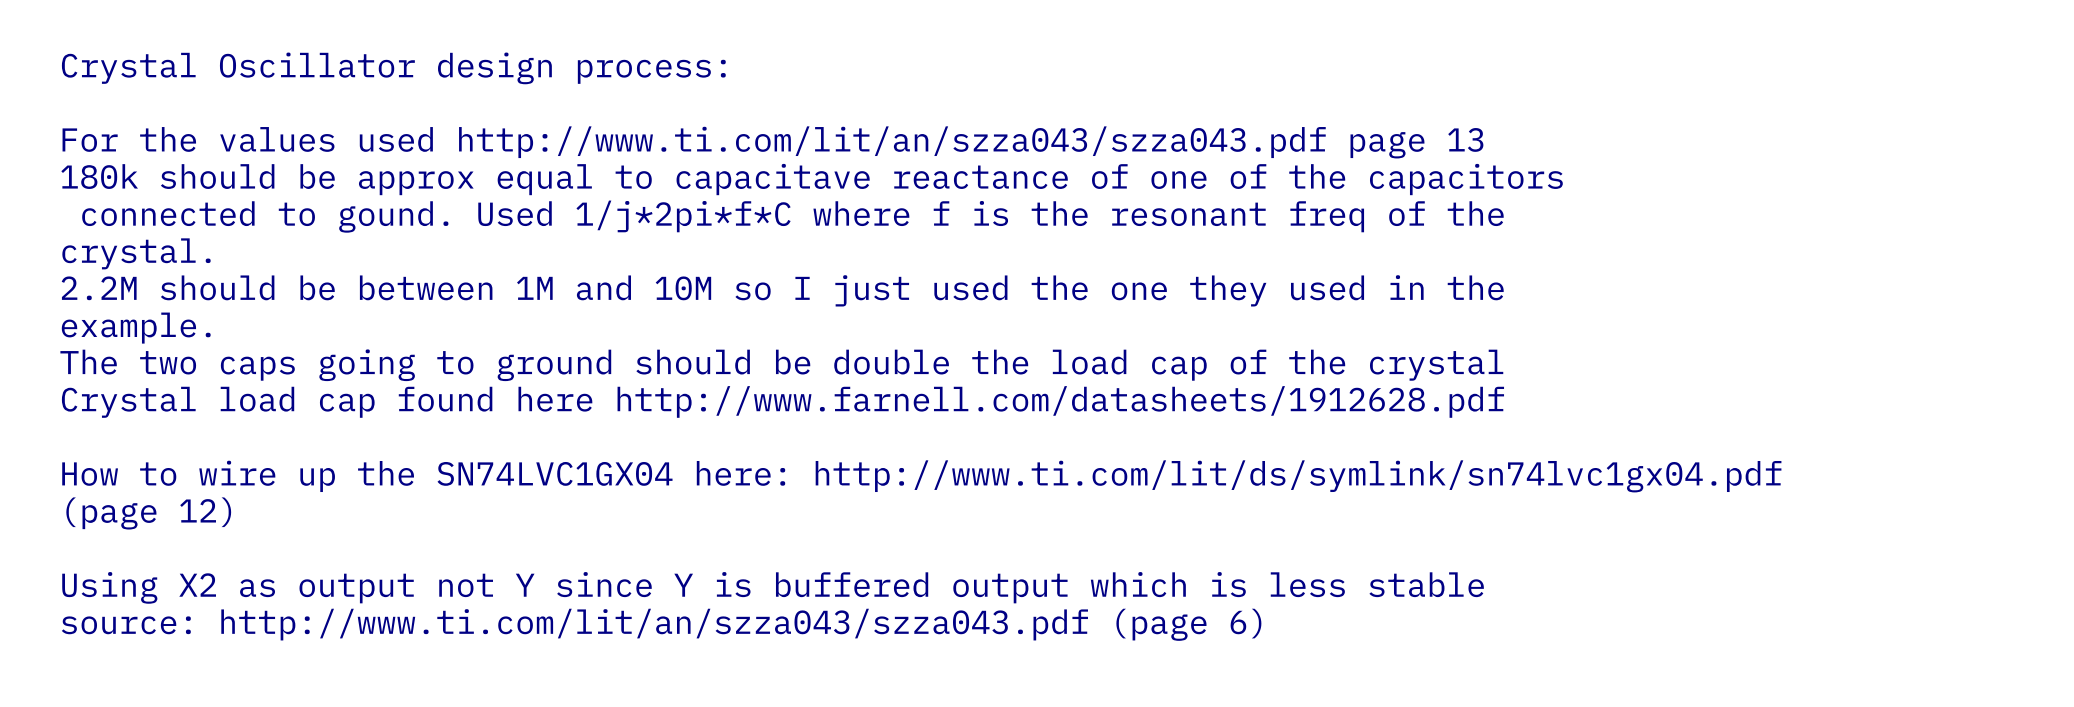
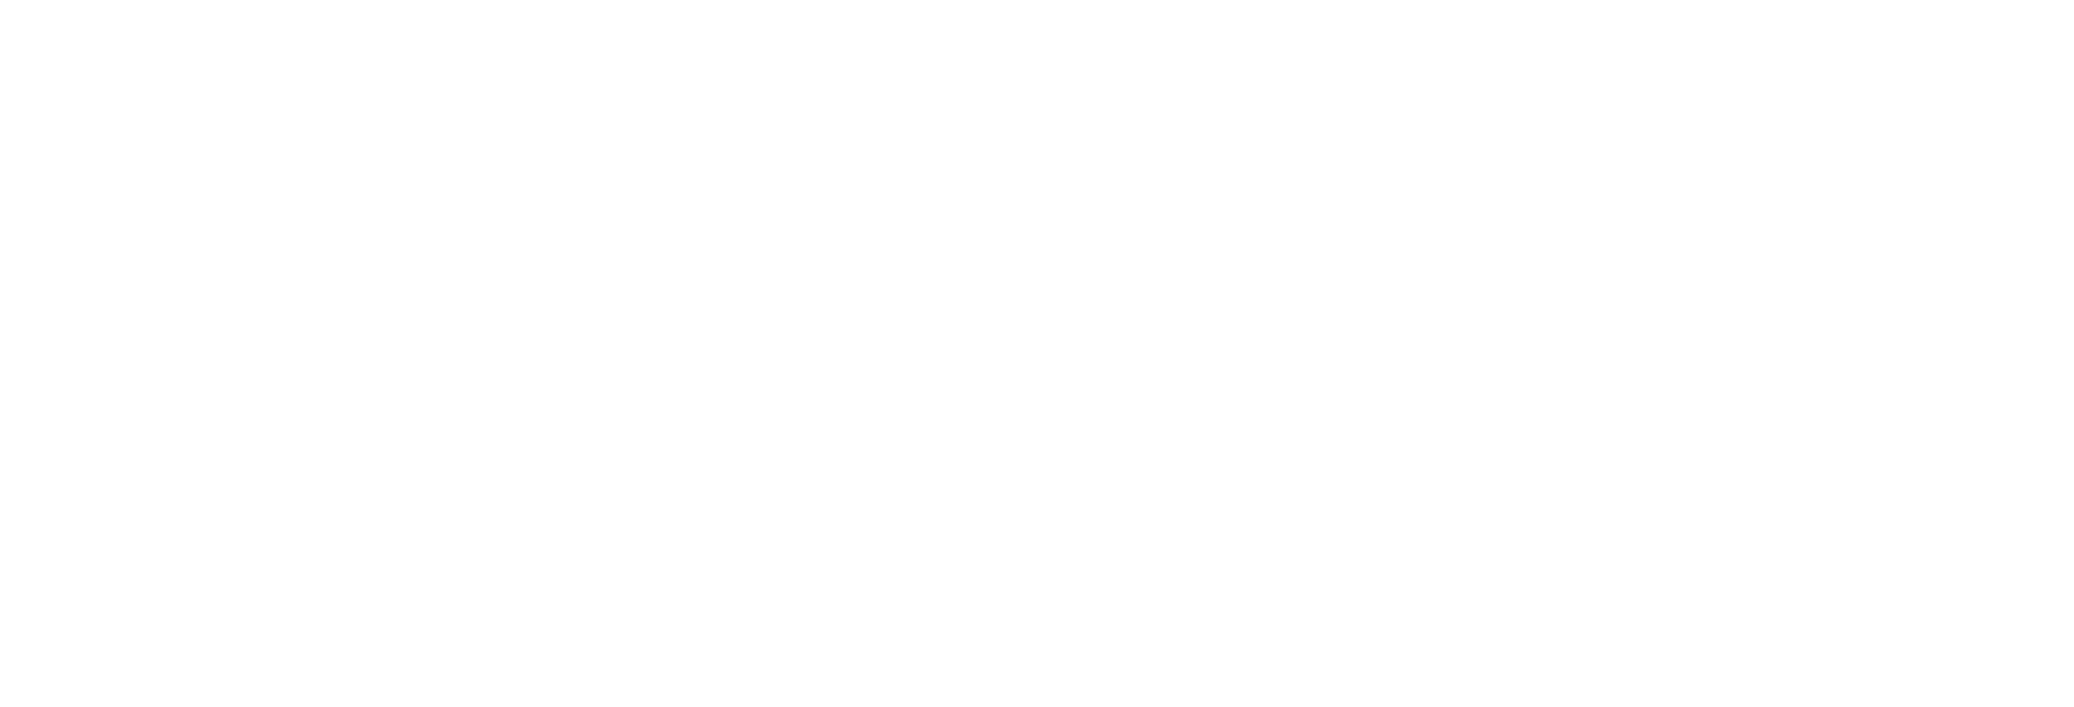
text: Crystal Oscillator design process: (393, 68) -> none
text: For the values used http://www.ti.com/lit/an/szza043/szza043.pdf page 13 (772, 142) -> none
text: 180k should be approx equal to capacitave reactance of one of the capacitors (812, 179) -> none
text: connected to gound. Used 1/j*2pi*f*C where f is the resonant freq of the (792, 216) -> none
text: crystal. (136, 253) -> none
text: 2.2M should be between 1M and 10M so I just used the one they used in the (782, 290) -> none
text: example. (136, 328) -> none
text: The two caps going to ground should be double the load cap of the crystal (781, 365) -> none
text: Crystal load cap found here http://www.farnell.com/datasheets/1912628.pdf (782, 401) -> none
text: How to wire up the SN74LVC1GX04 here: http://www.ti.com/lit/ds/symlink/sn74lvc1gx04.pdf (921, 476) -> none
text: (page 12) (148, 513) -> none
text: Using X2 as output not Y since Y is buffered output which is less stable (773, 587) -> none
text: source: http://www.ti.com/lit/an/szza043/szza043.pdf (page 6) (661, 624) -> none

